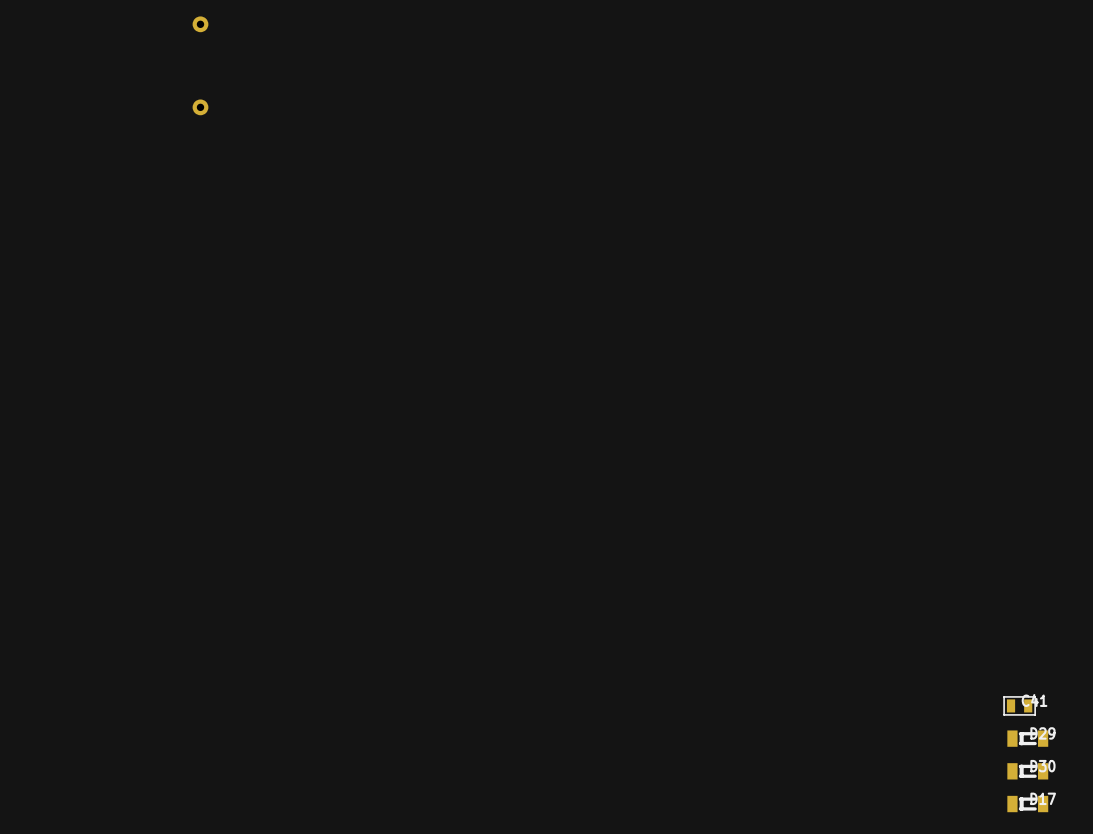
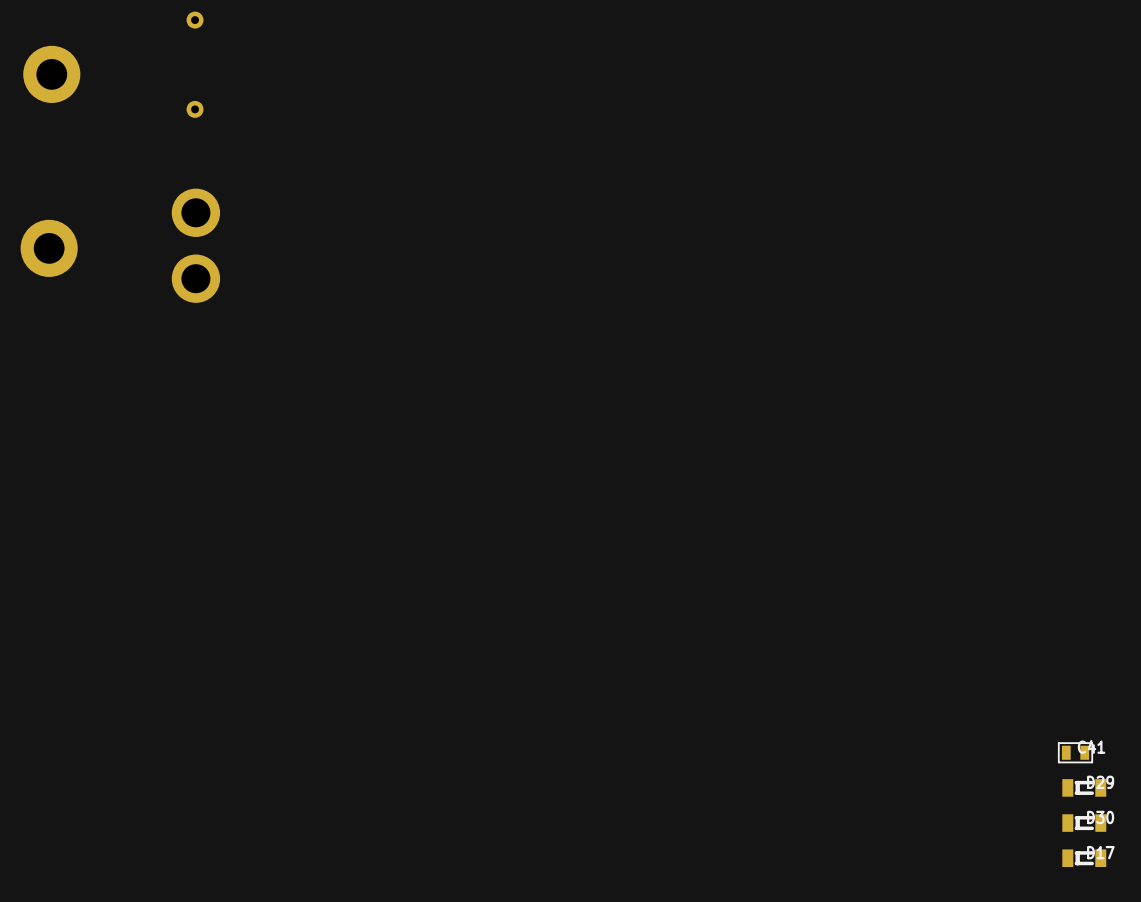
part: none -> (51, 74)
part: none -> (195, 245)
part: none -> (49, 248)

